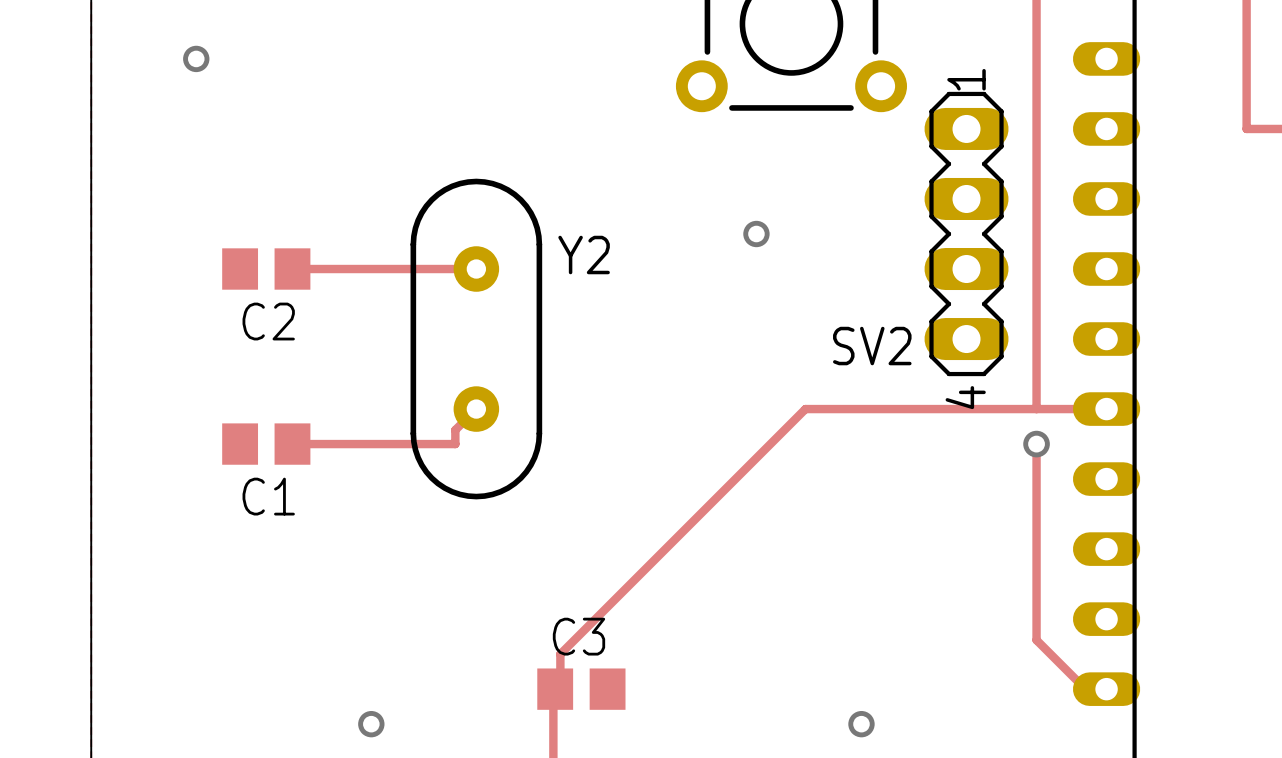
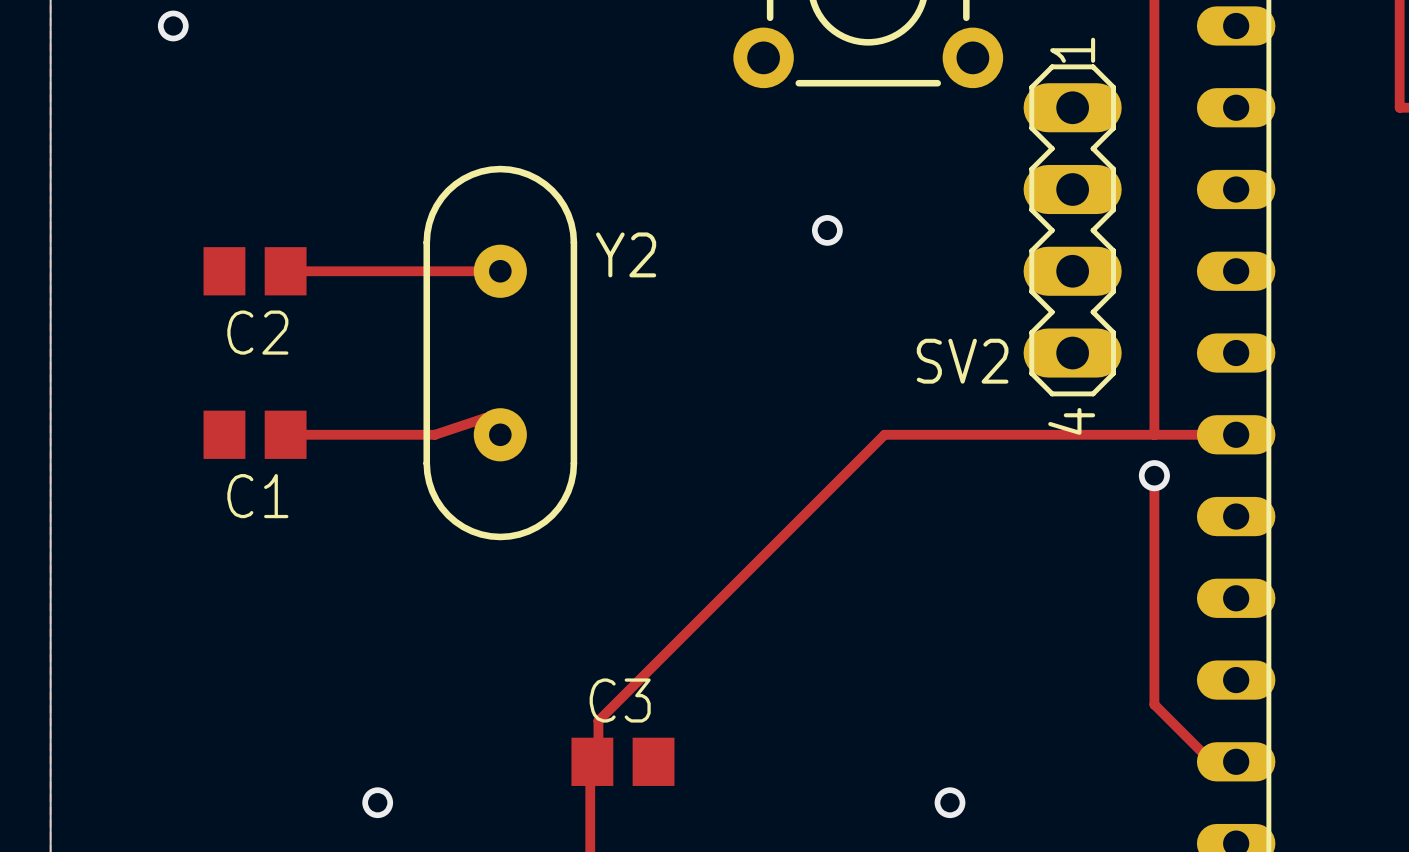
track: (476, 409) (455, 430) (455, 444) (292, 444) -> (500, 434) (483, 418) (434, 434) (285, 434)
C1 position: (266, 444) -> (255, 434)

